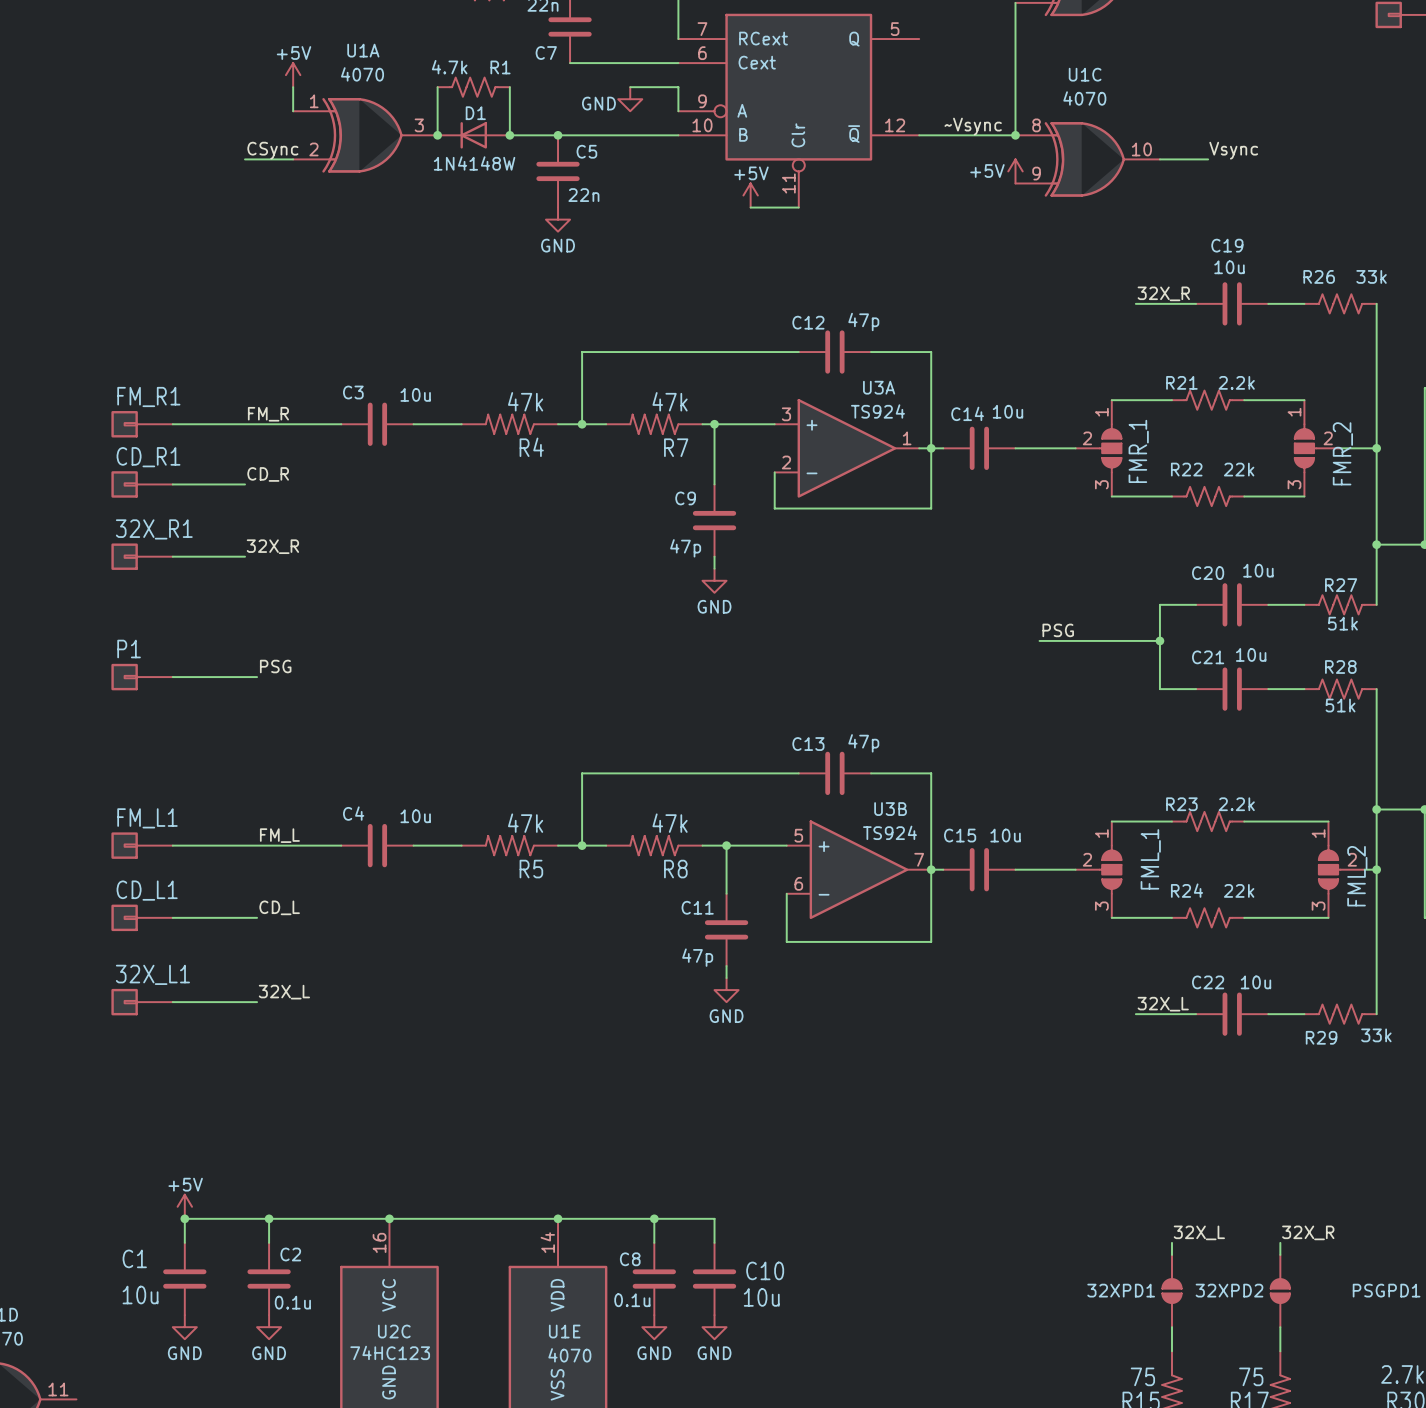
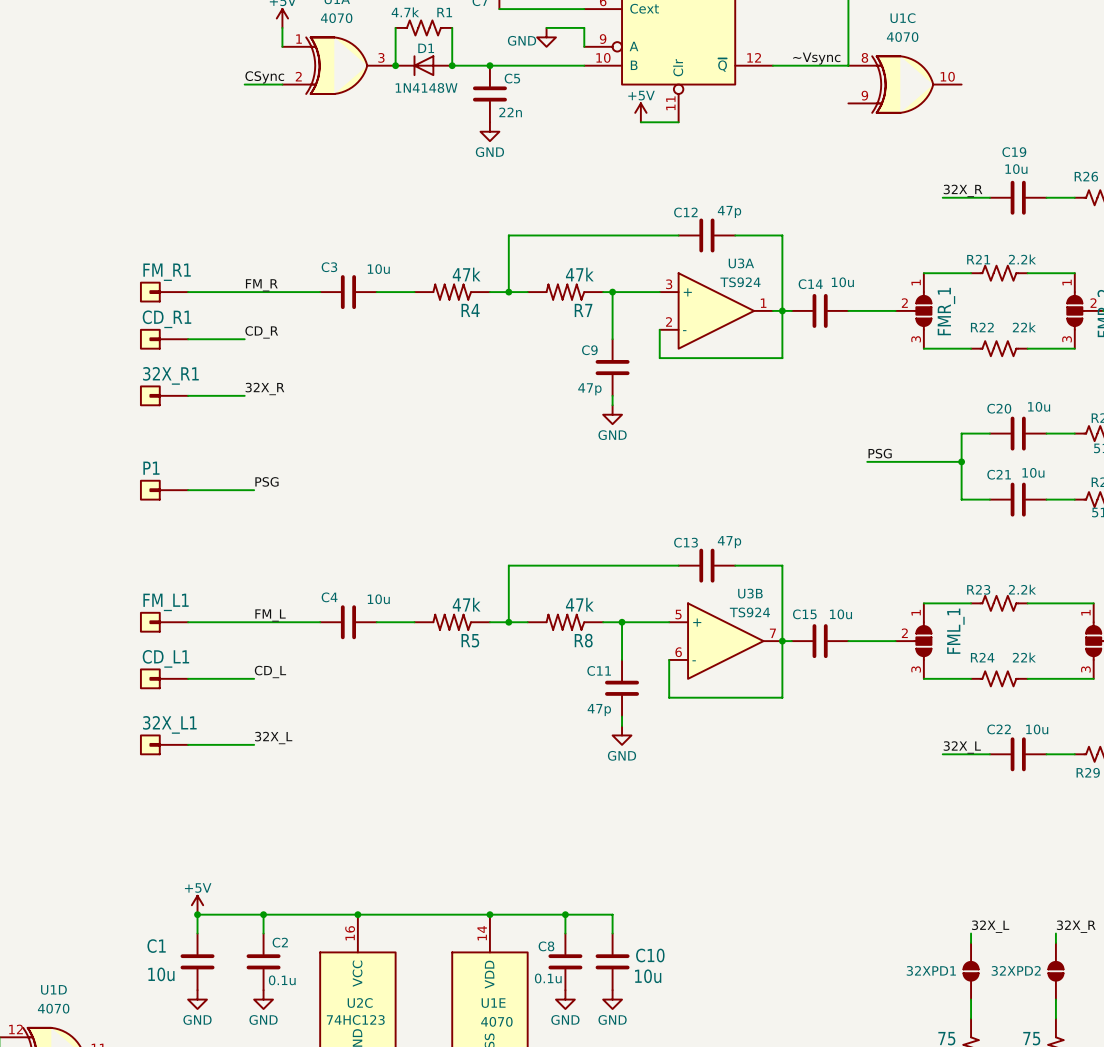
junction: (1015, 135) -> none
label: Vsync (1233, 150) -> none
wire: (1159, 159) (1208, 159) -> none
power symbol: +5V (1015, 171) -> none

